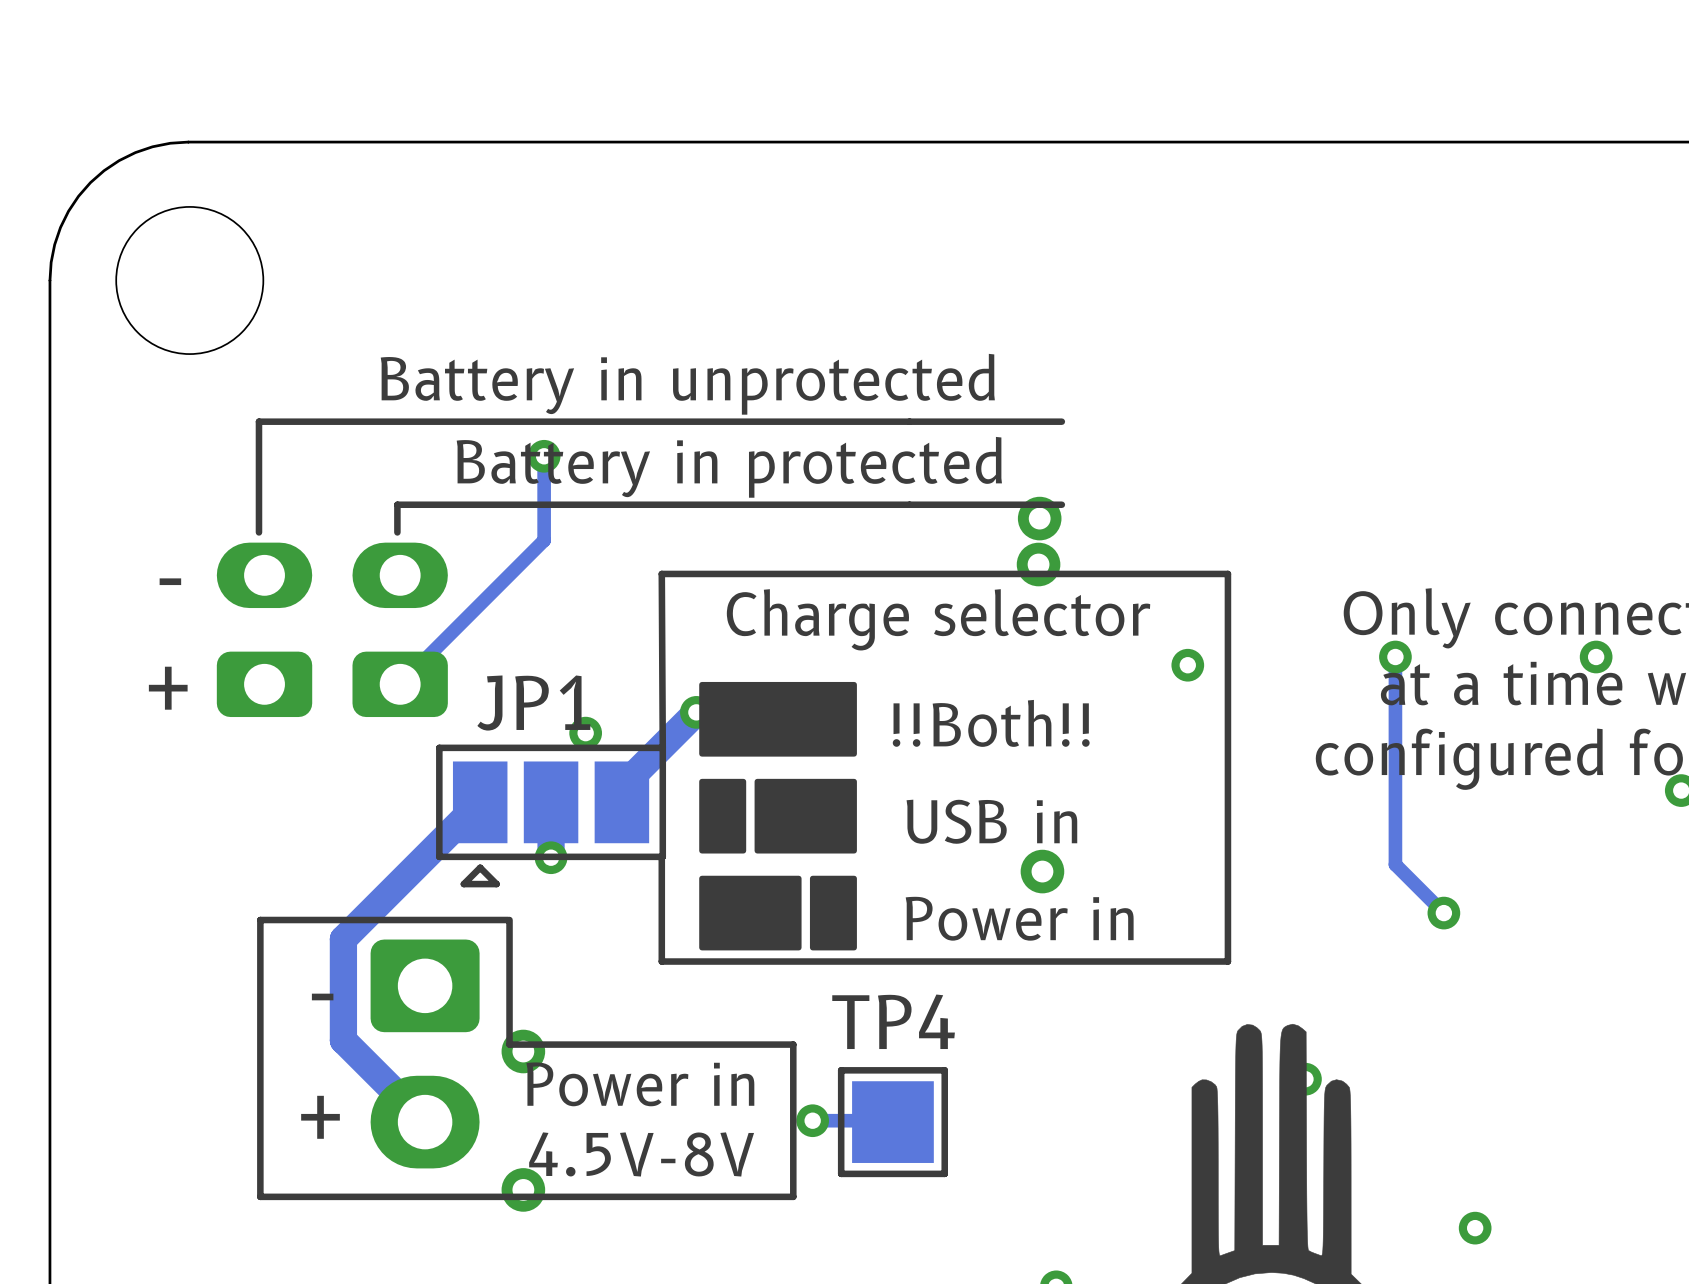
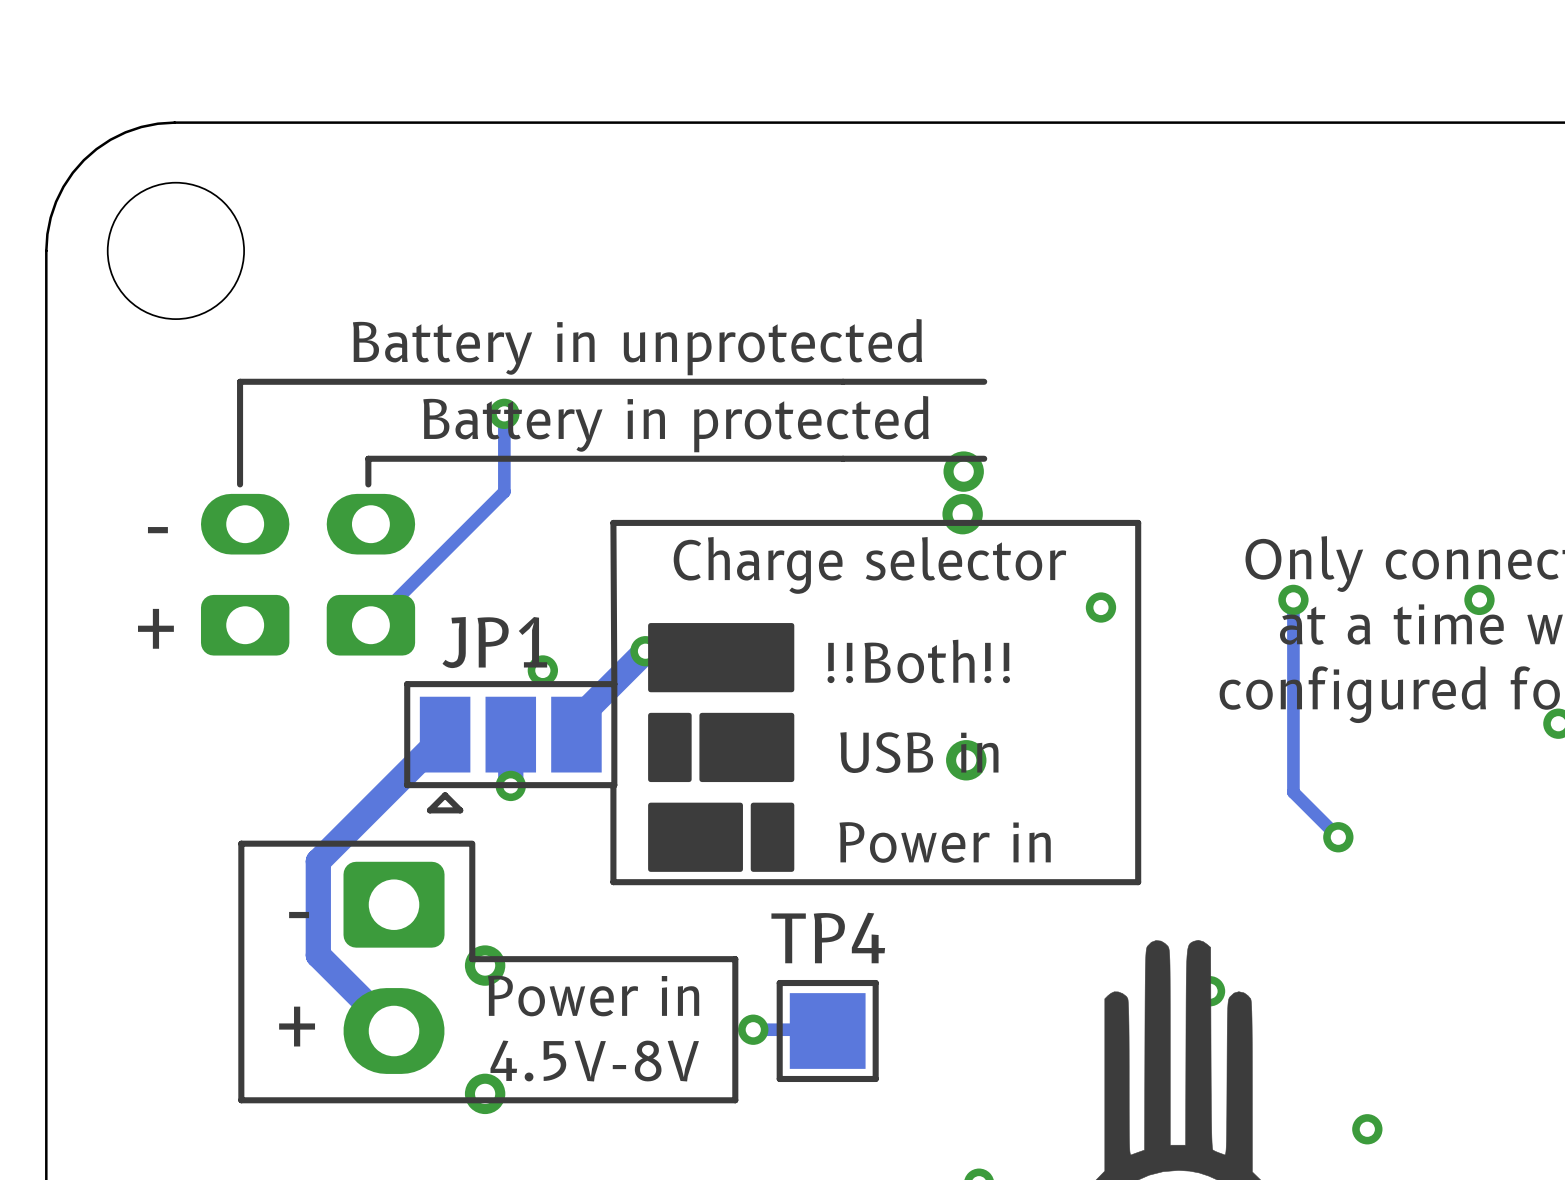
via position: (1042, 871) -> (966, 760)

